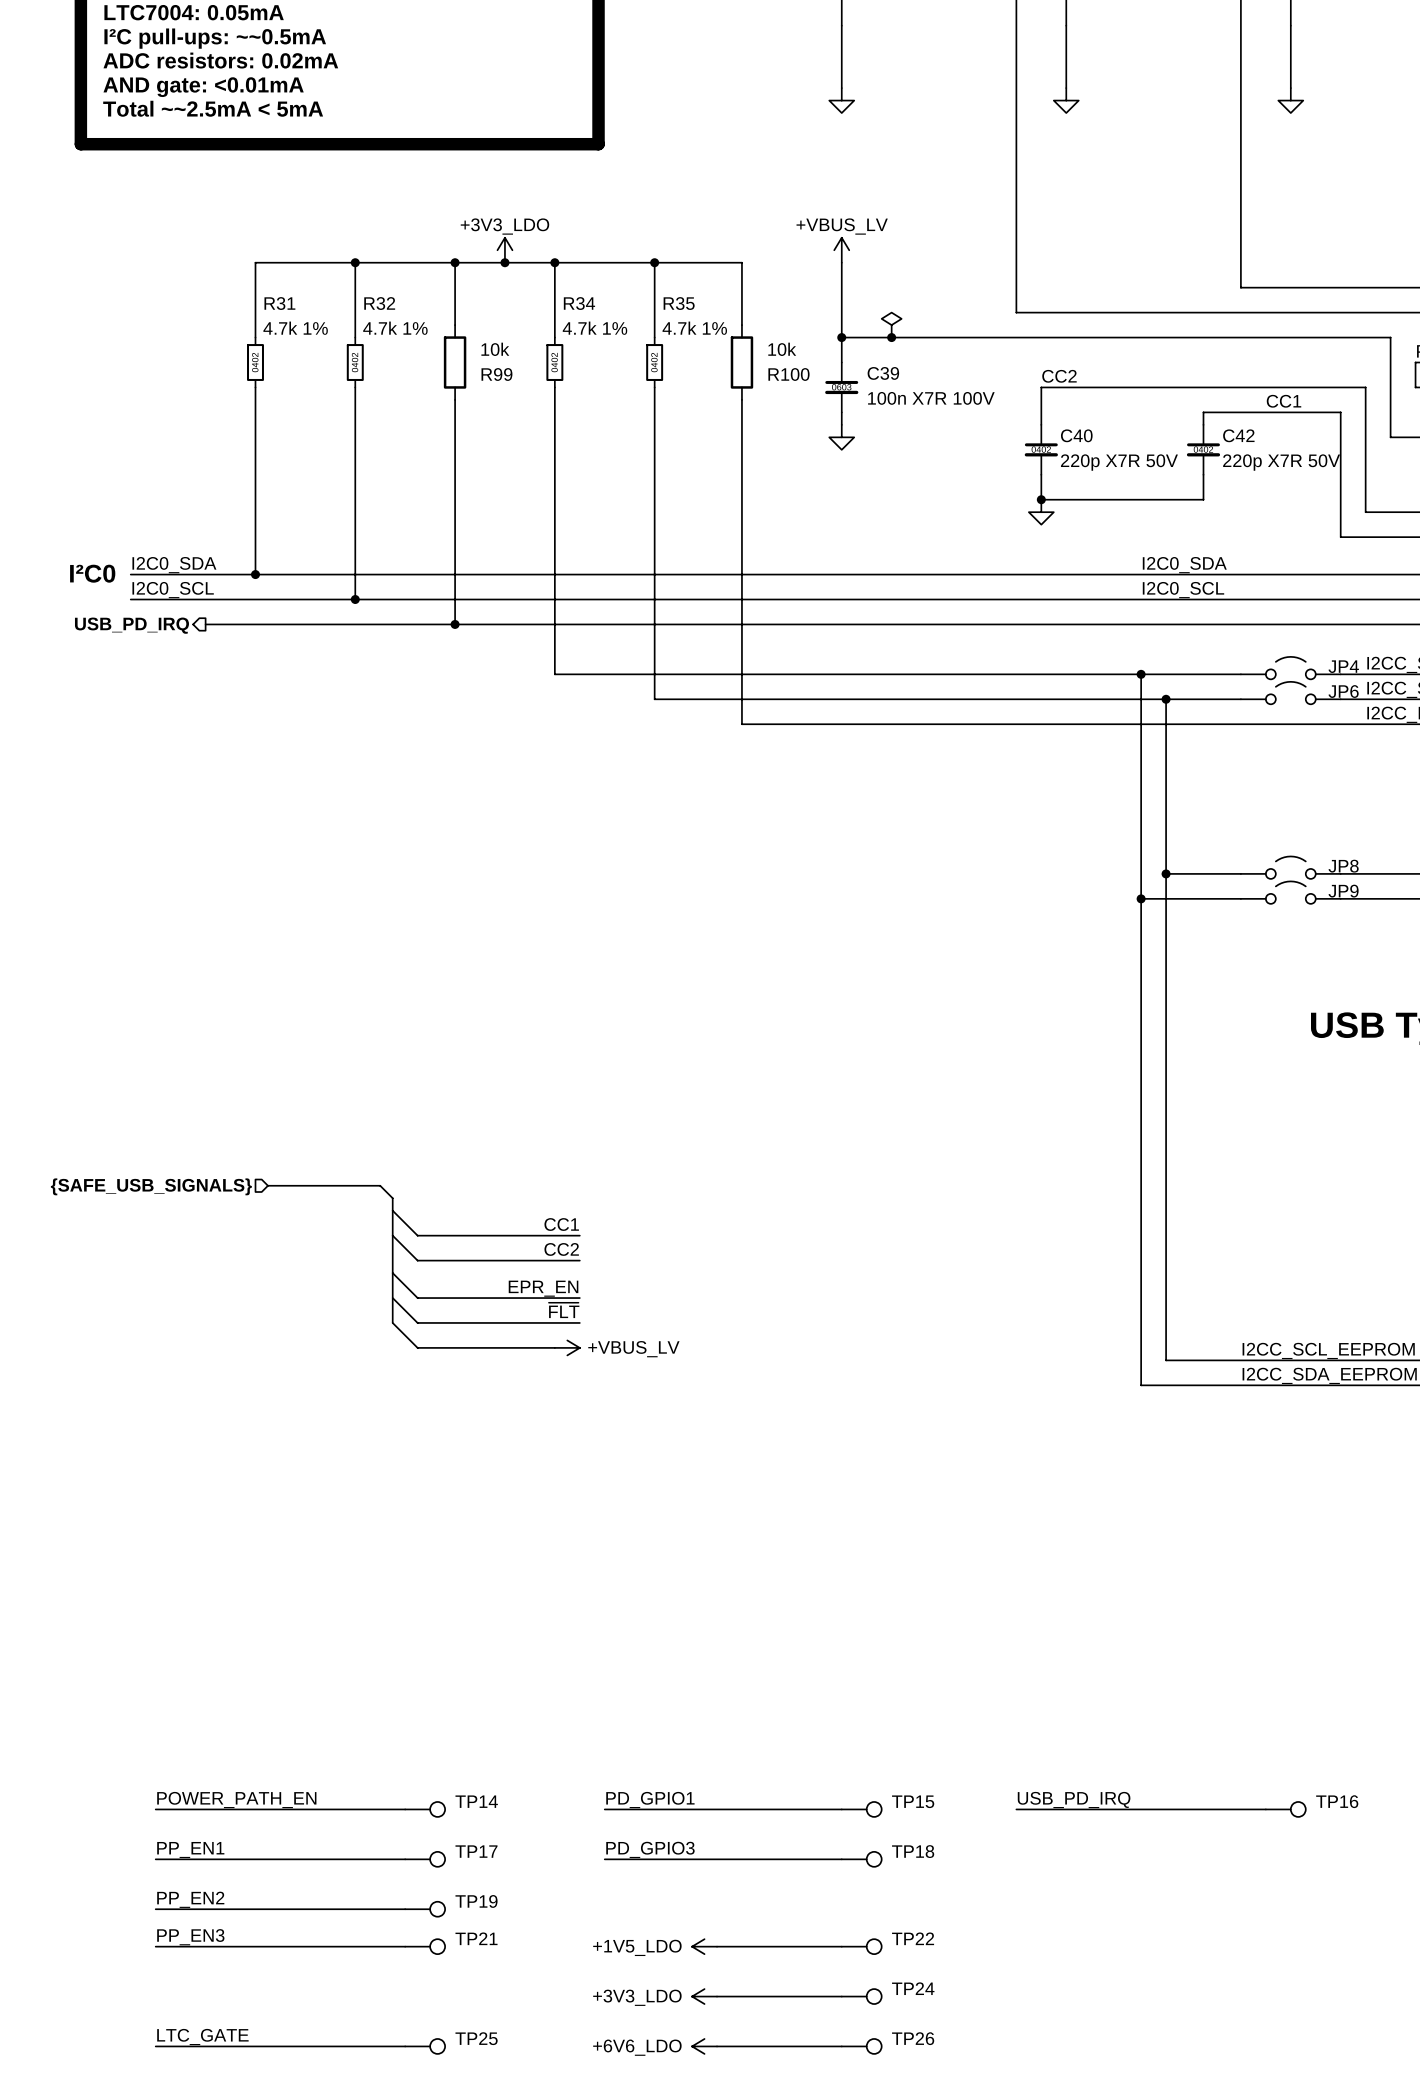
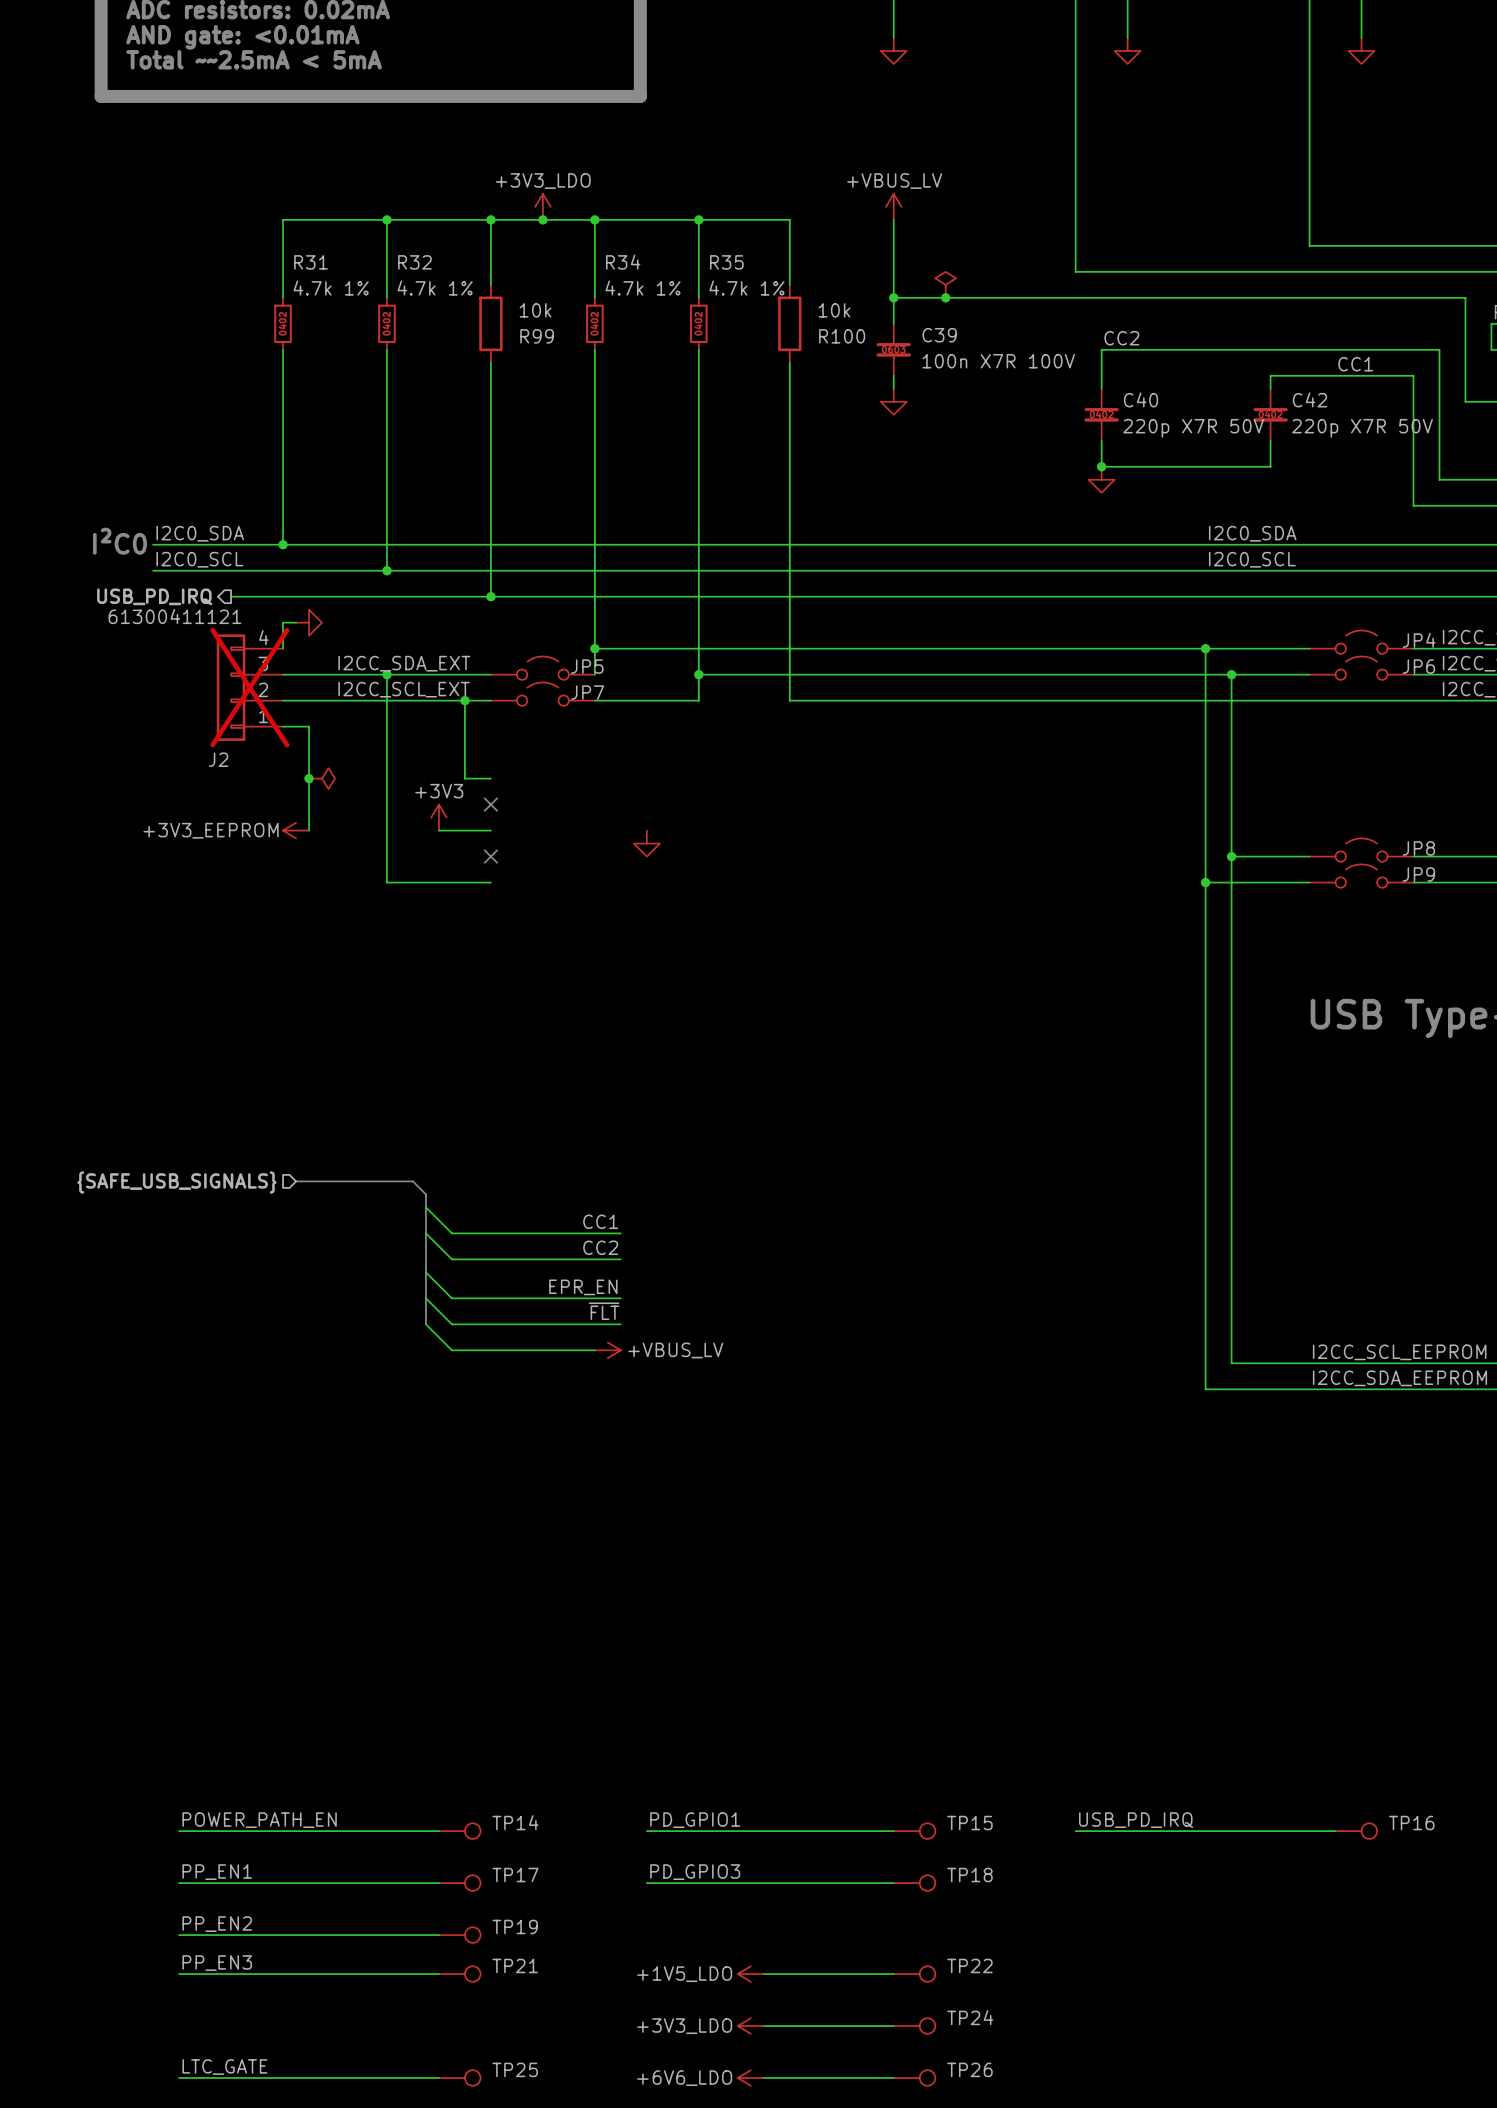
wire: none -> (296, 622) (283, 622) (283, 648)
power symbol: none -> (309, 622)
wire: none -> (594, 648) (594, 674)
junction: none -> (594, 648)
label: none -> I2CC_SDA_EXT (404, 663)
JP5: none -> (542, 668)
wire: none -> (283, 674) (490, 674)
wire: none -> (386, 674) (386, 882) (490, 882)
junction: none -> (386, 674)
wire: none -> (698, 674) (698, 700) (594, 700)
junction: none -> (698, 674)
J2: none -> 61300411121 (249, 687)
label: none -> I2CC_SCL_EXT (404, 689)
JP7: none -> (542, 694)
wire: none -> (283, 700) (490, 700)
wire: none -> (464, 700) (464, 778) (490, 778)
junction: none -> (464, 700)
wire: none -> (283, 726) (309, 726) (309, 830)
junction: none -> (309, 778)
power symbol: none -> (322, 778)
no-connect mark: none -> (490, 804)
power symbol: none -> +3V3 (438, 817)
power symbol: none -> +3V3_EEPROM (296, 830)
wire: none -> (438, 830) (490, 830)
power symbol: none -> (646, 843)
no-connect mark: none -> (490, 856)

